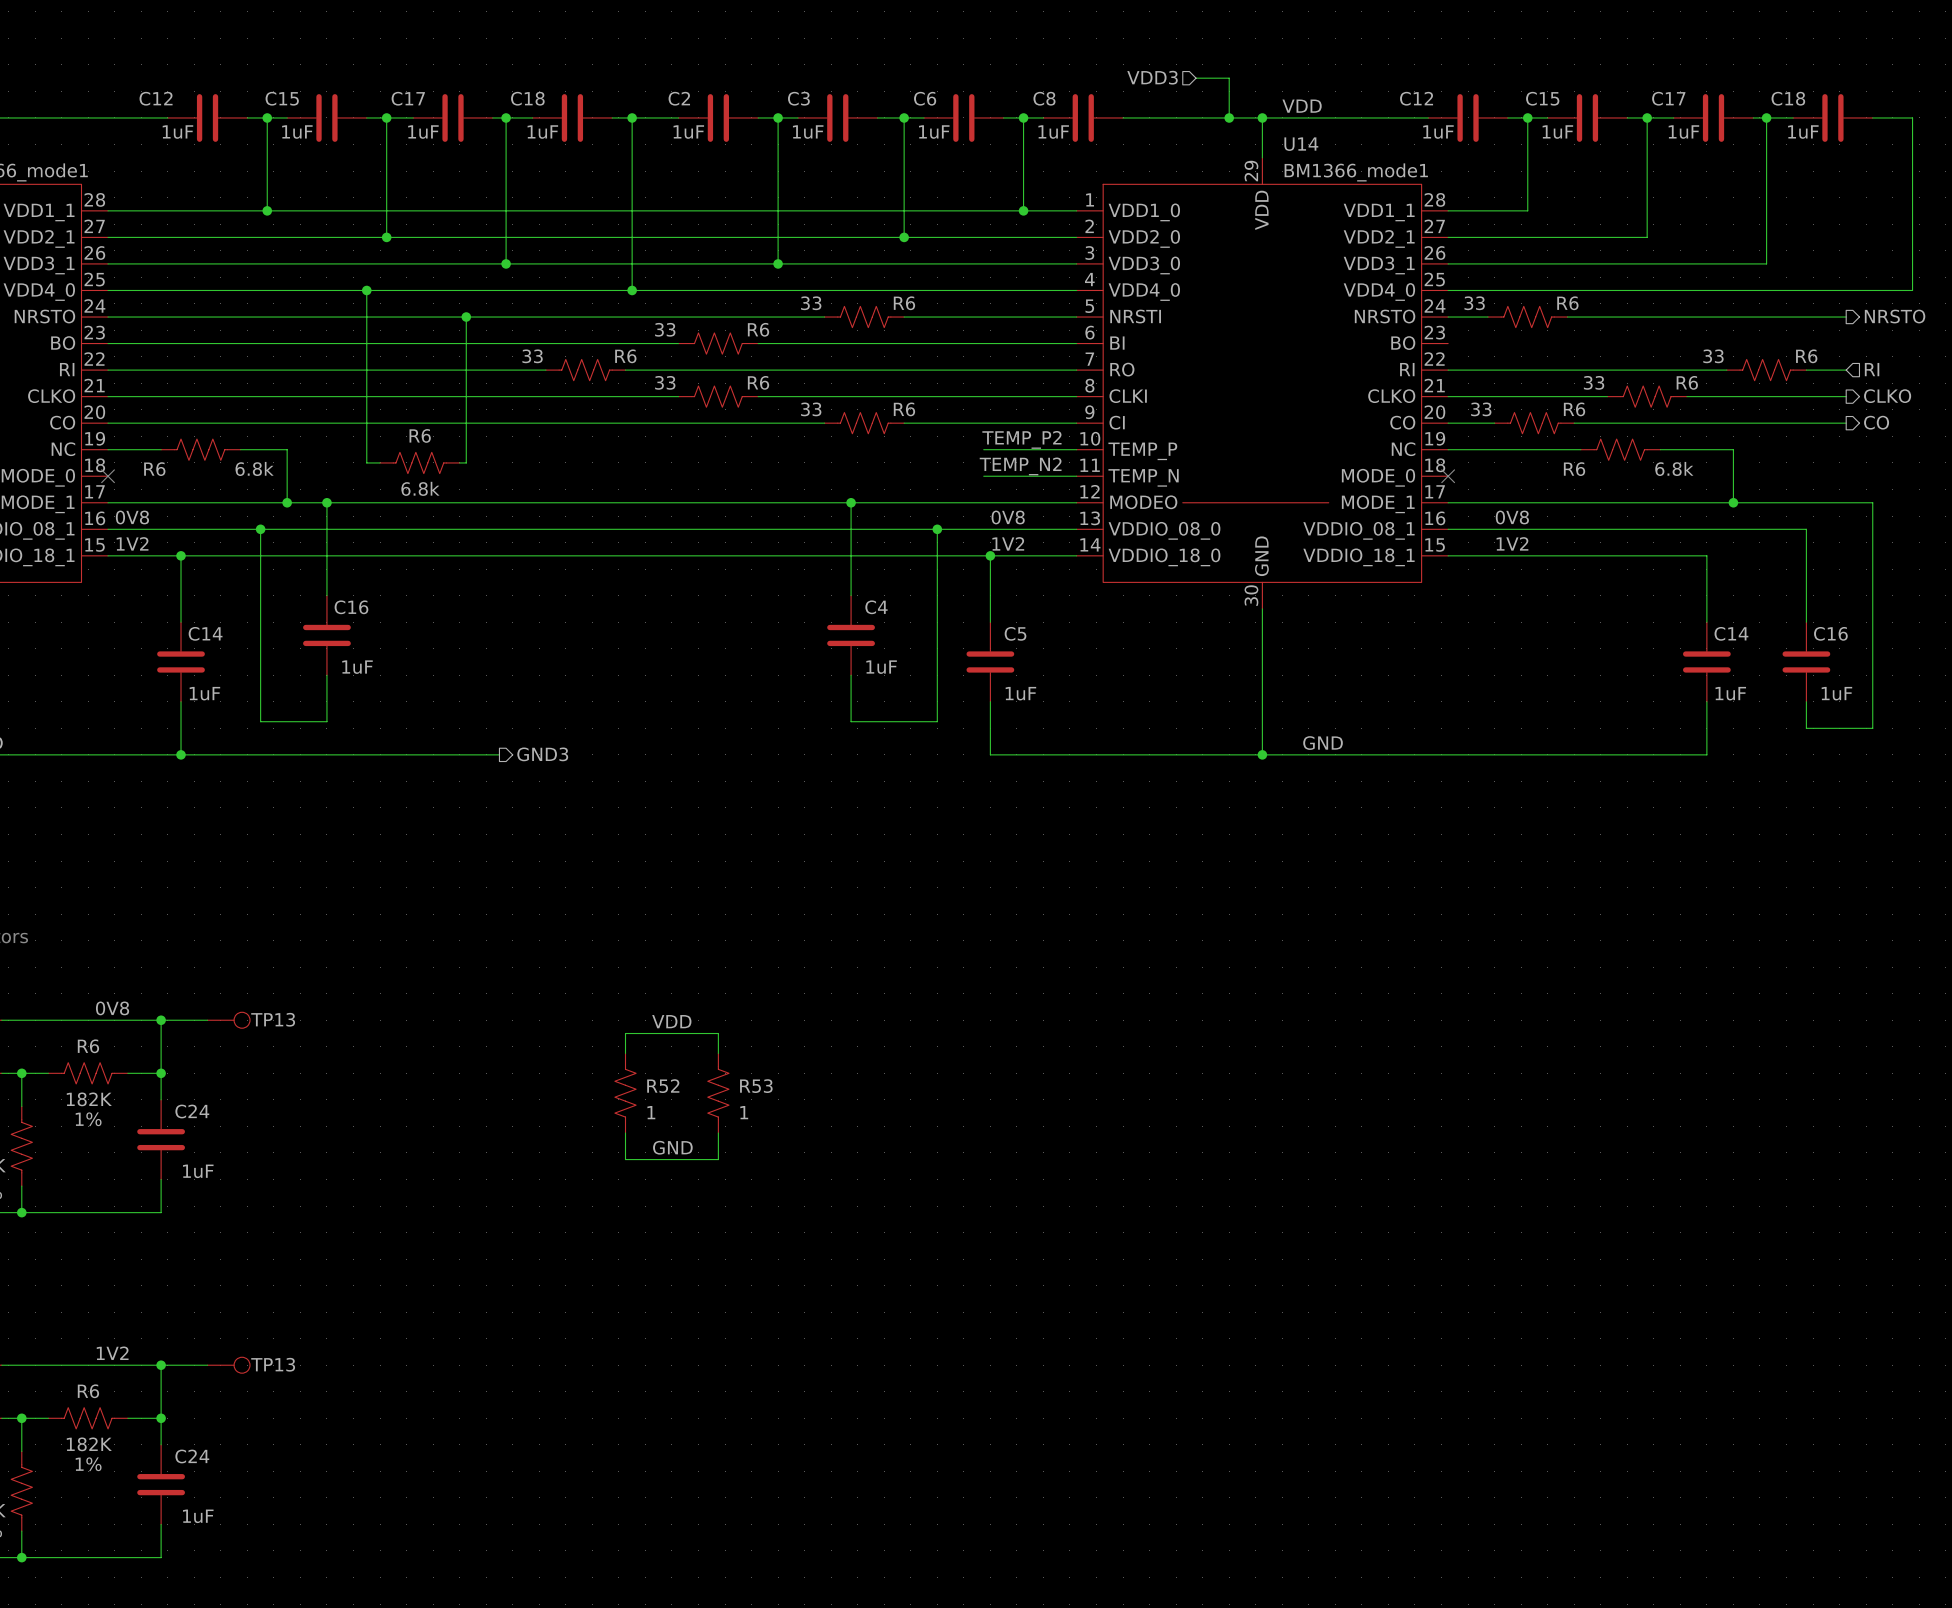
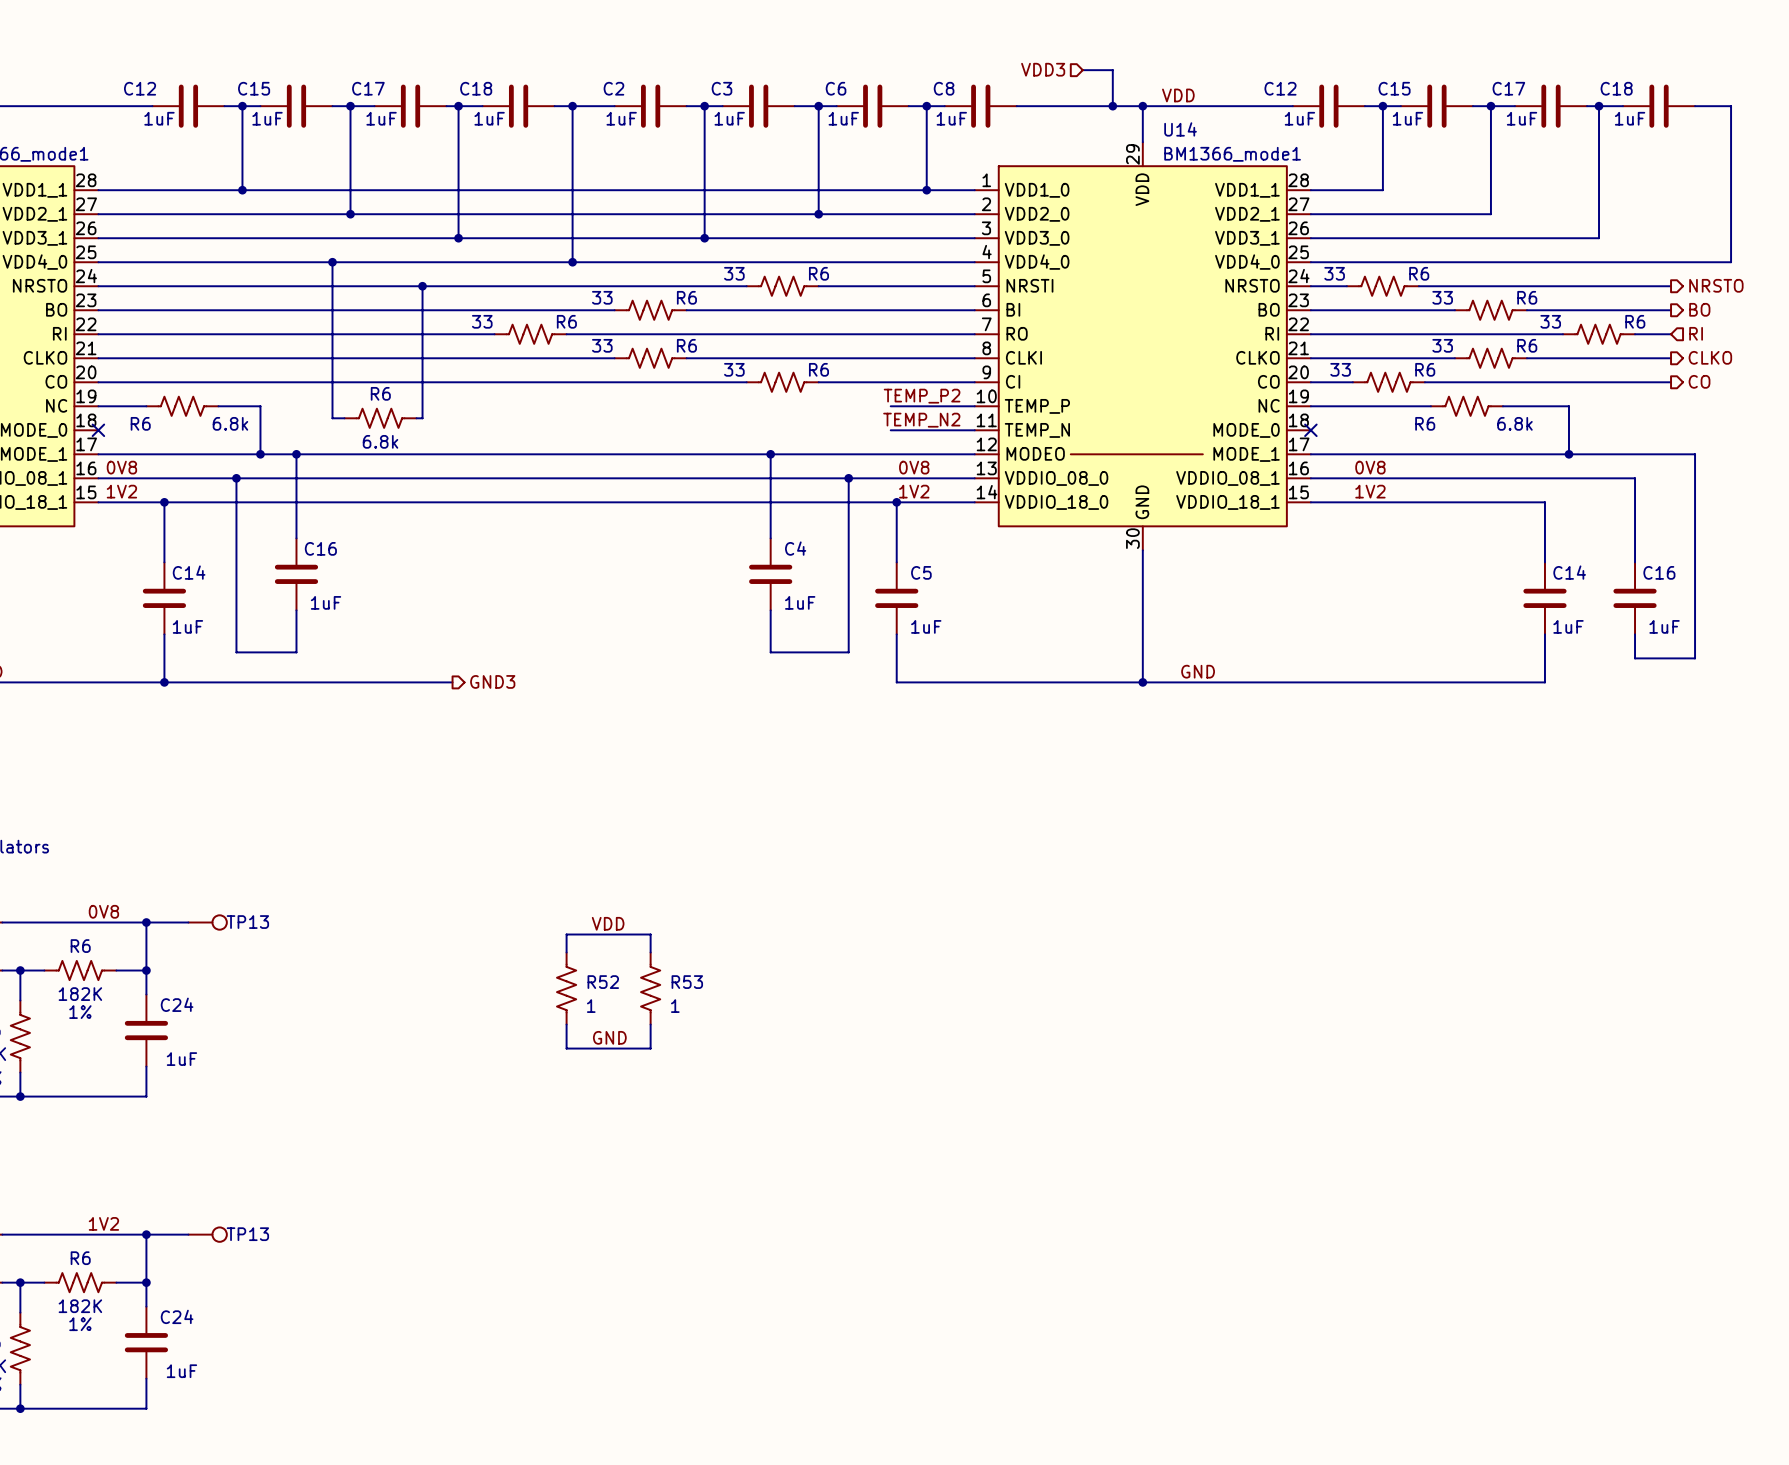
wire: none -> (1310, 310) (1454, 310)
R6: none -> 33 (1490, 310)
wire: none -> (1526, 310) (1671, 310)
hierarchical label: none -> BO (1699, 309)

